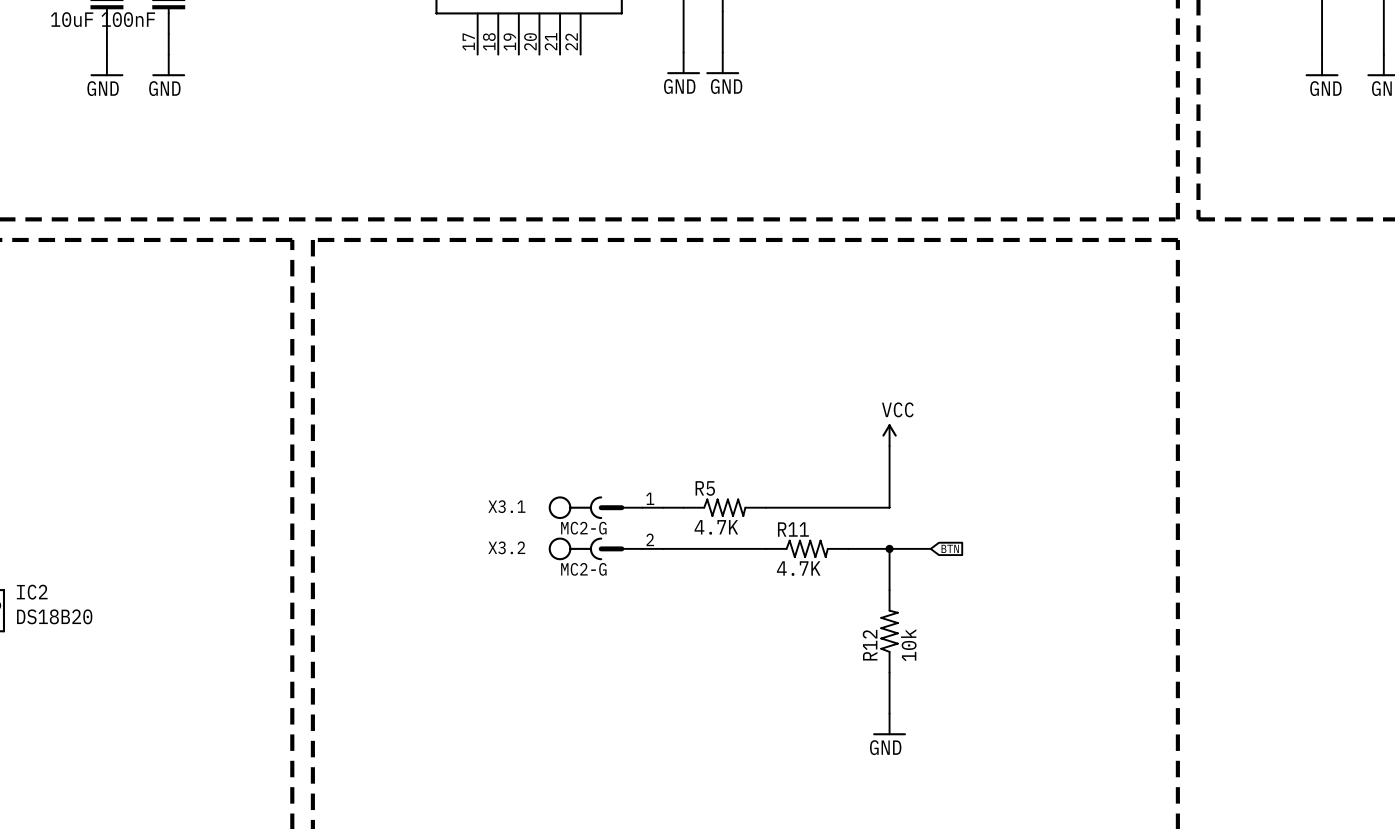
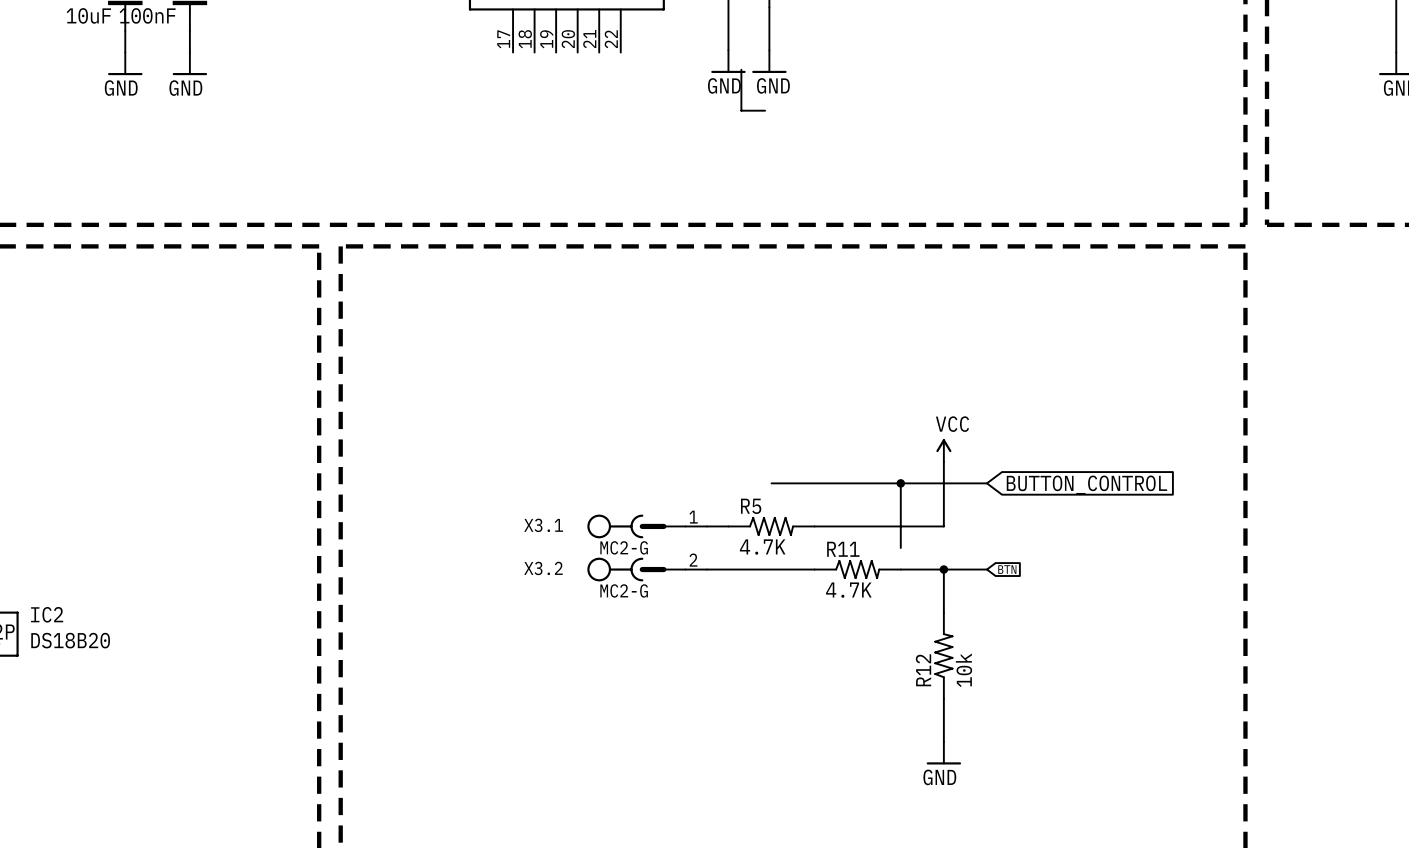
wire: none -> (741, 69) (741, 110) (765, 110)
wire: none -> (771, 483) (986, 483)
wire: none -> (900, 483) (900, 547)
junction: none -> (900, 483)
global label: none -> BUTTON_CONTROL (1086, 485)

